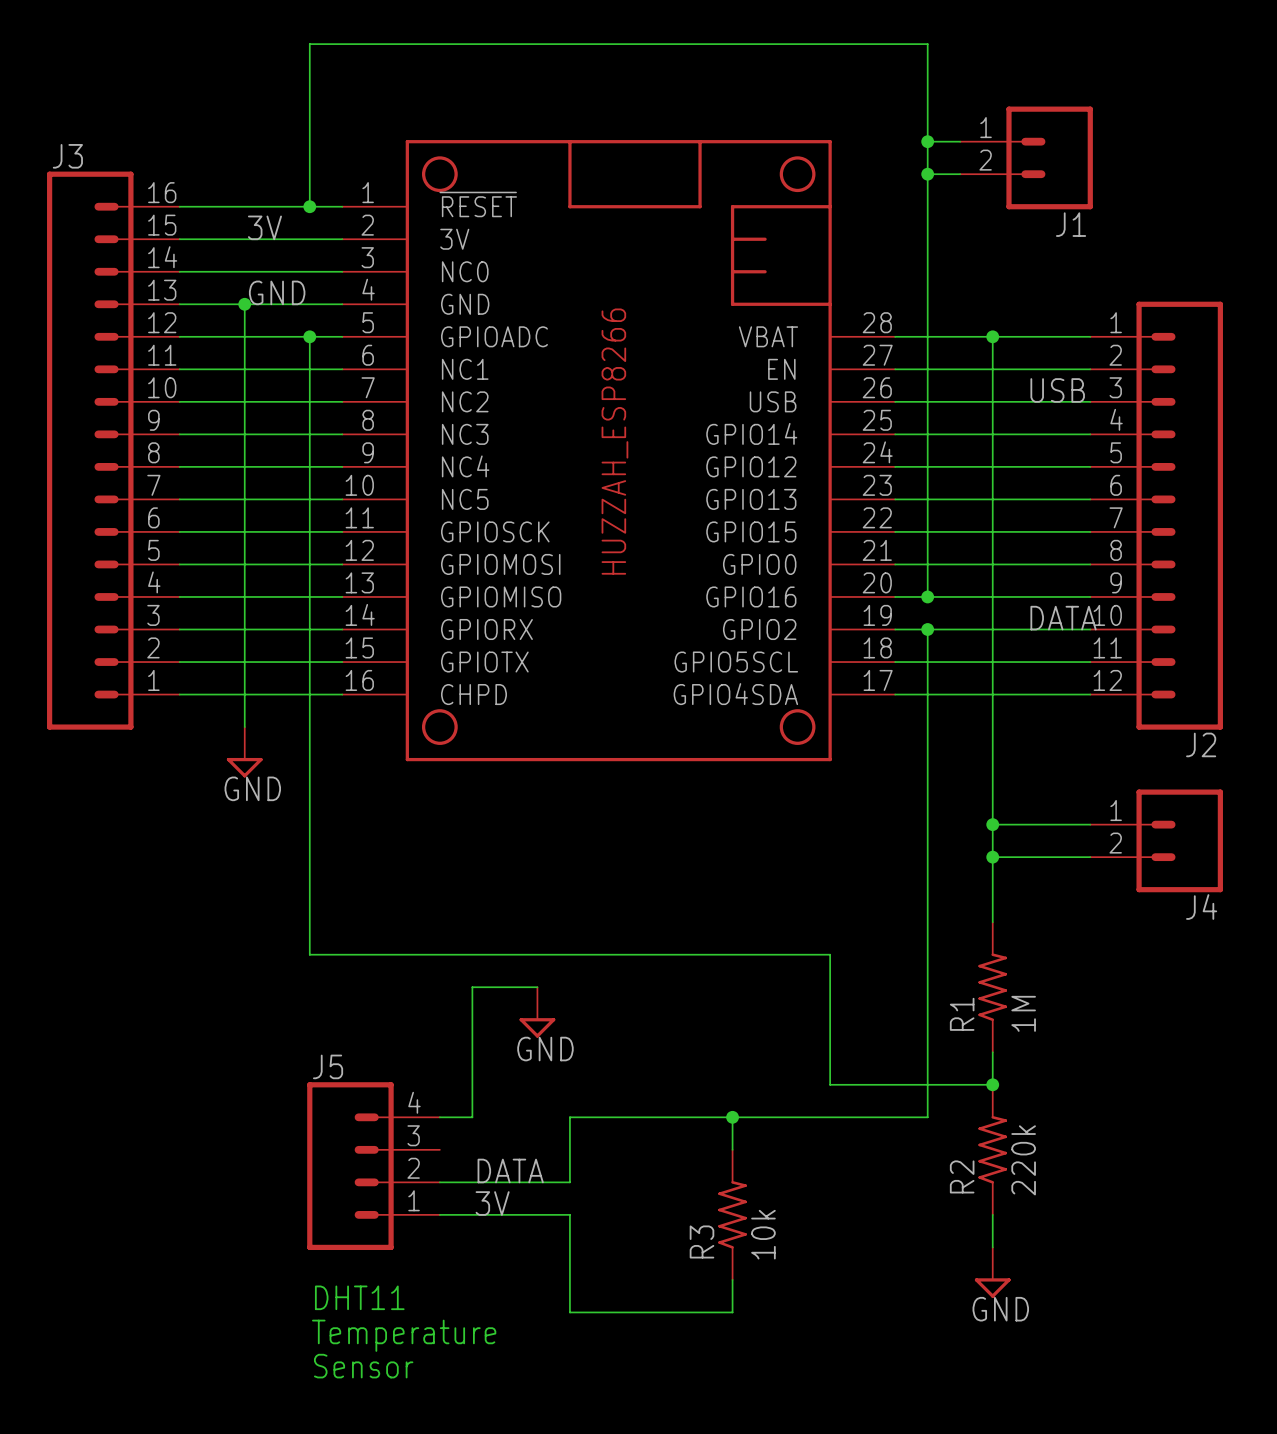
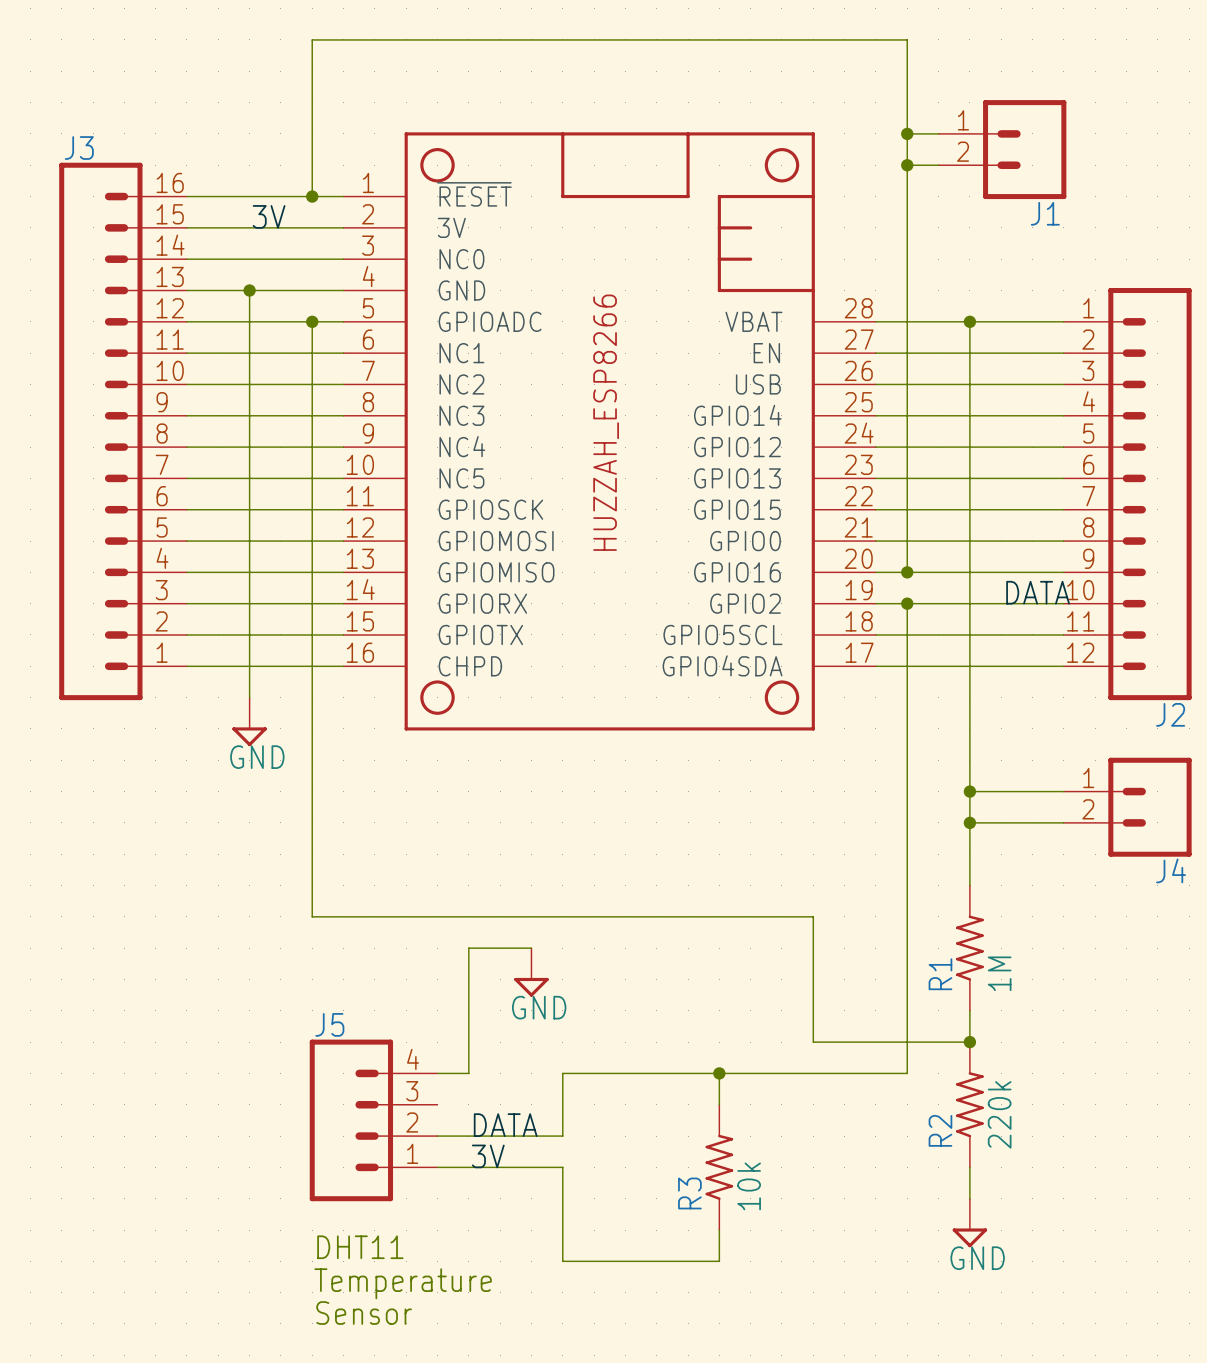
label: GND (277, 292) -> none
label: USB (1057, 390) -> none

